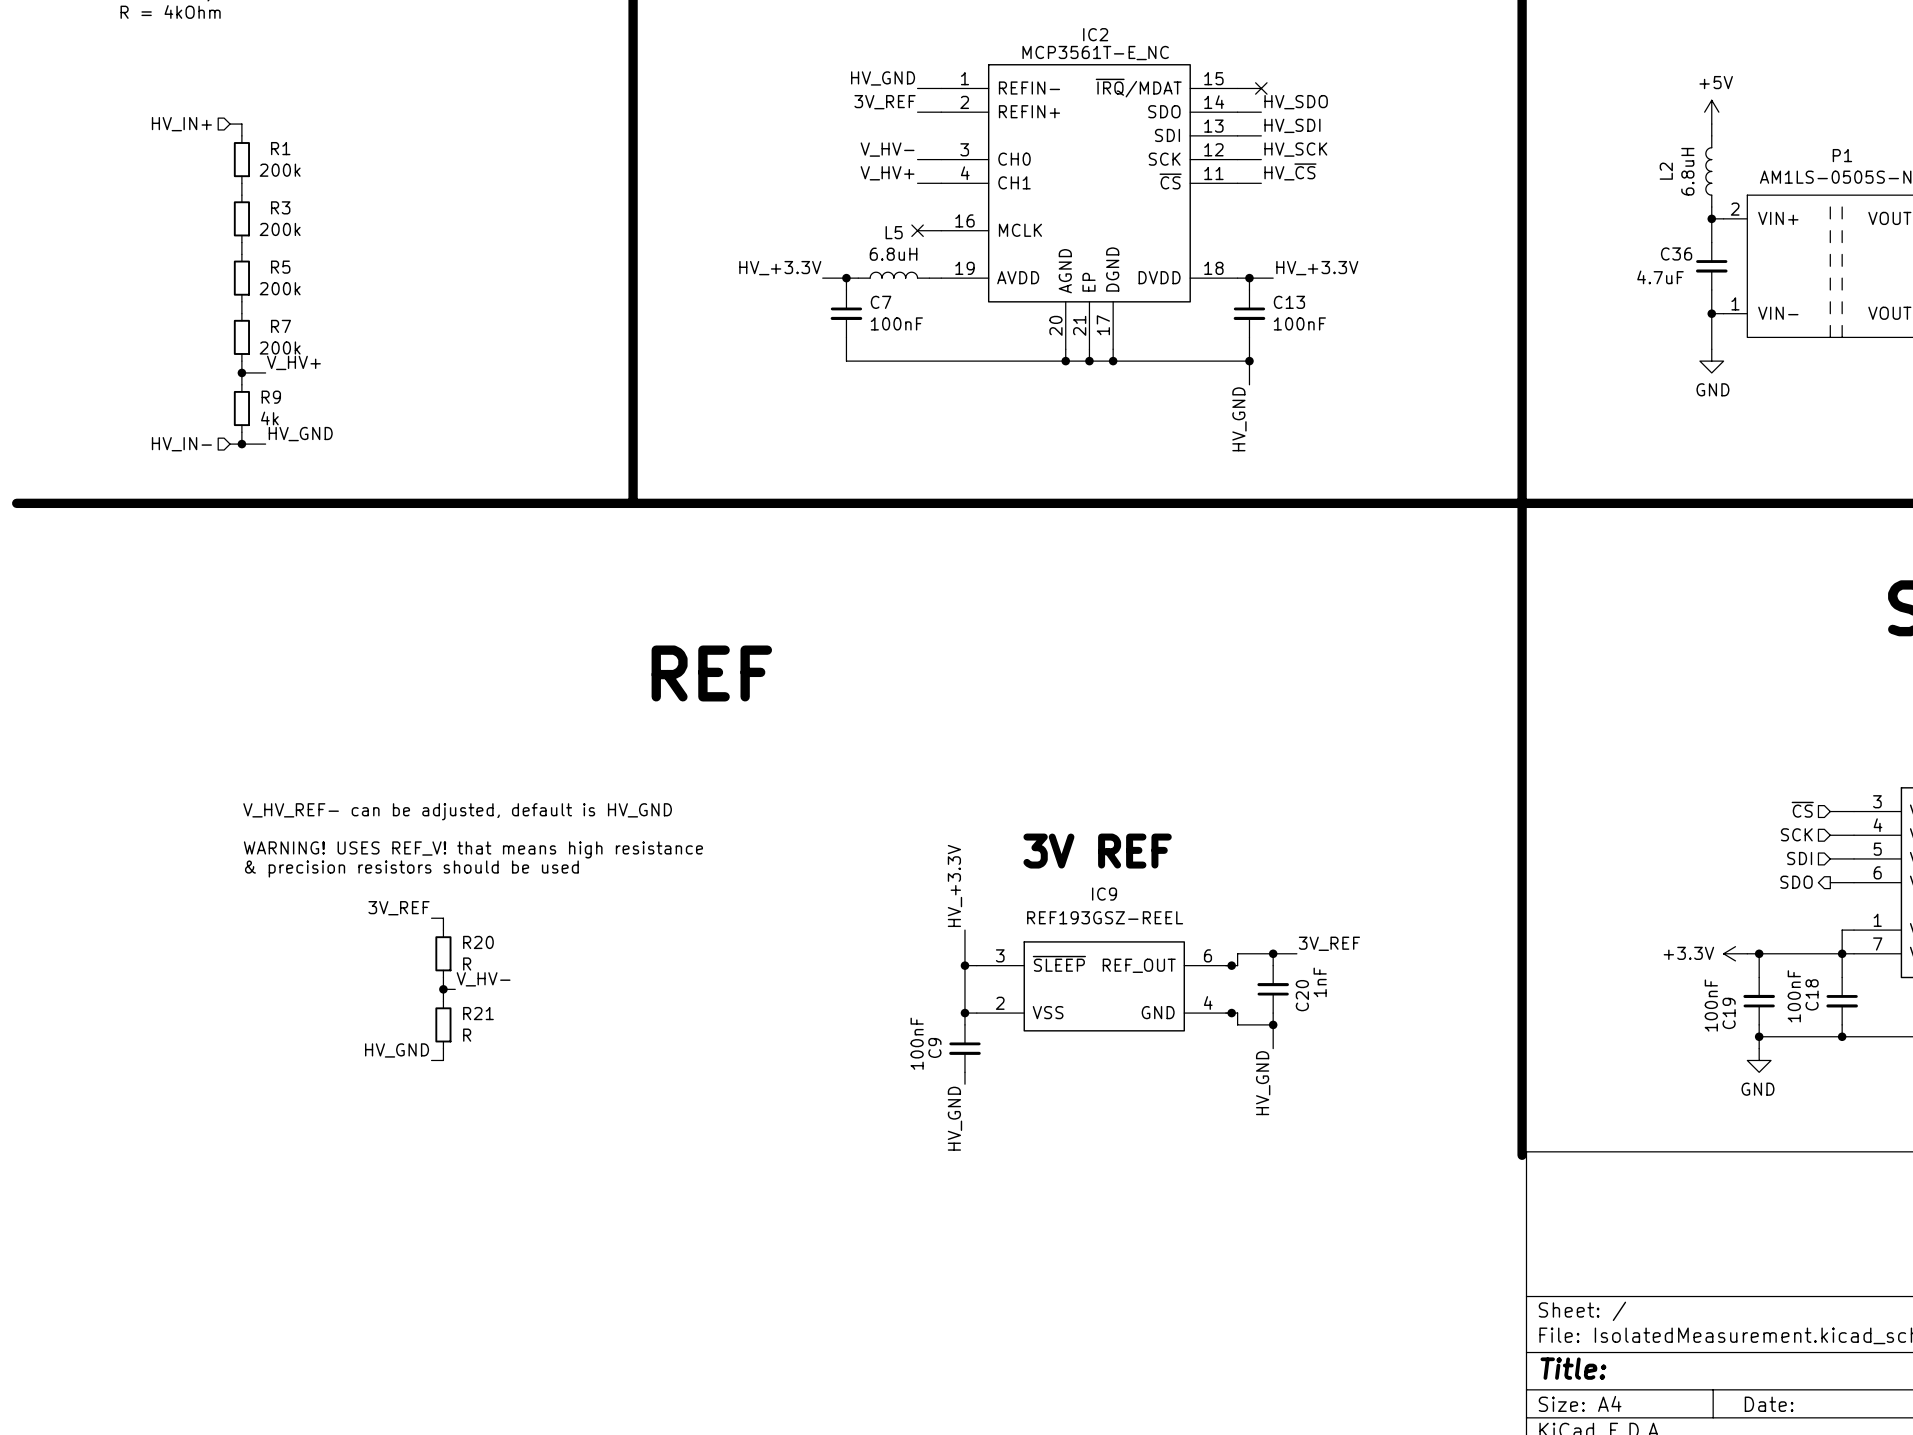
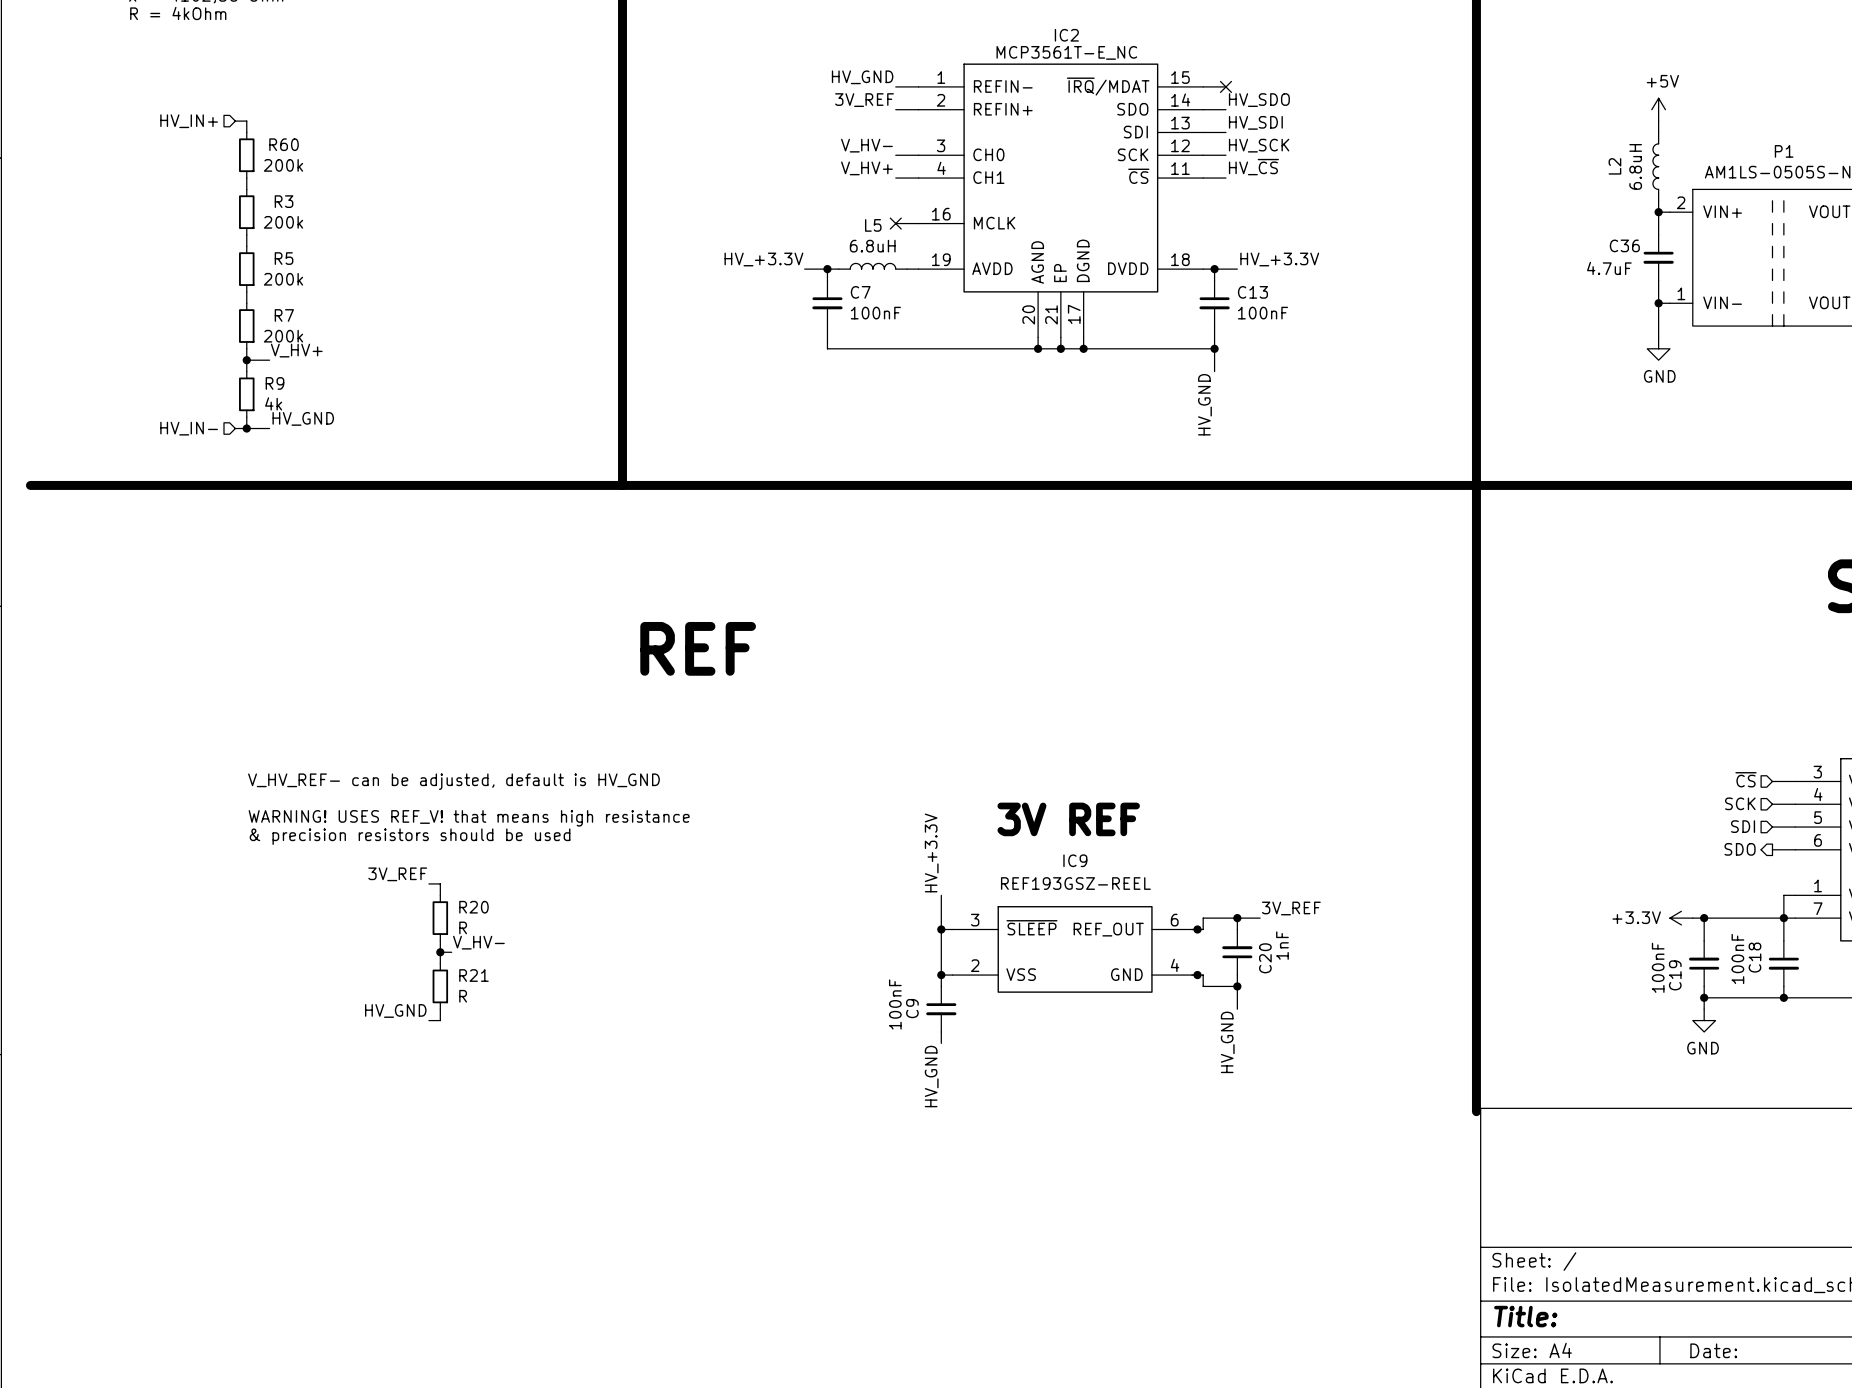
R1 name: R1 (280, 148) -> R60 (284, 144)

